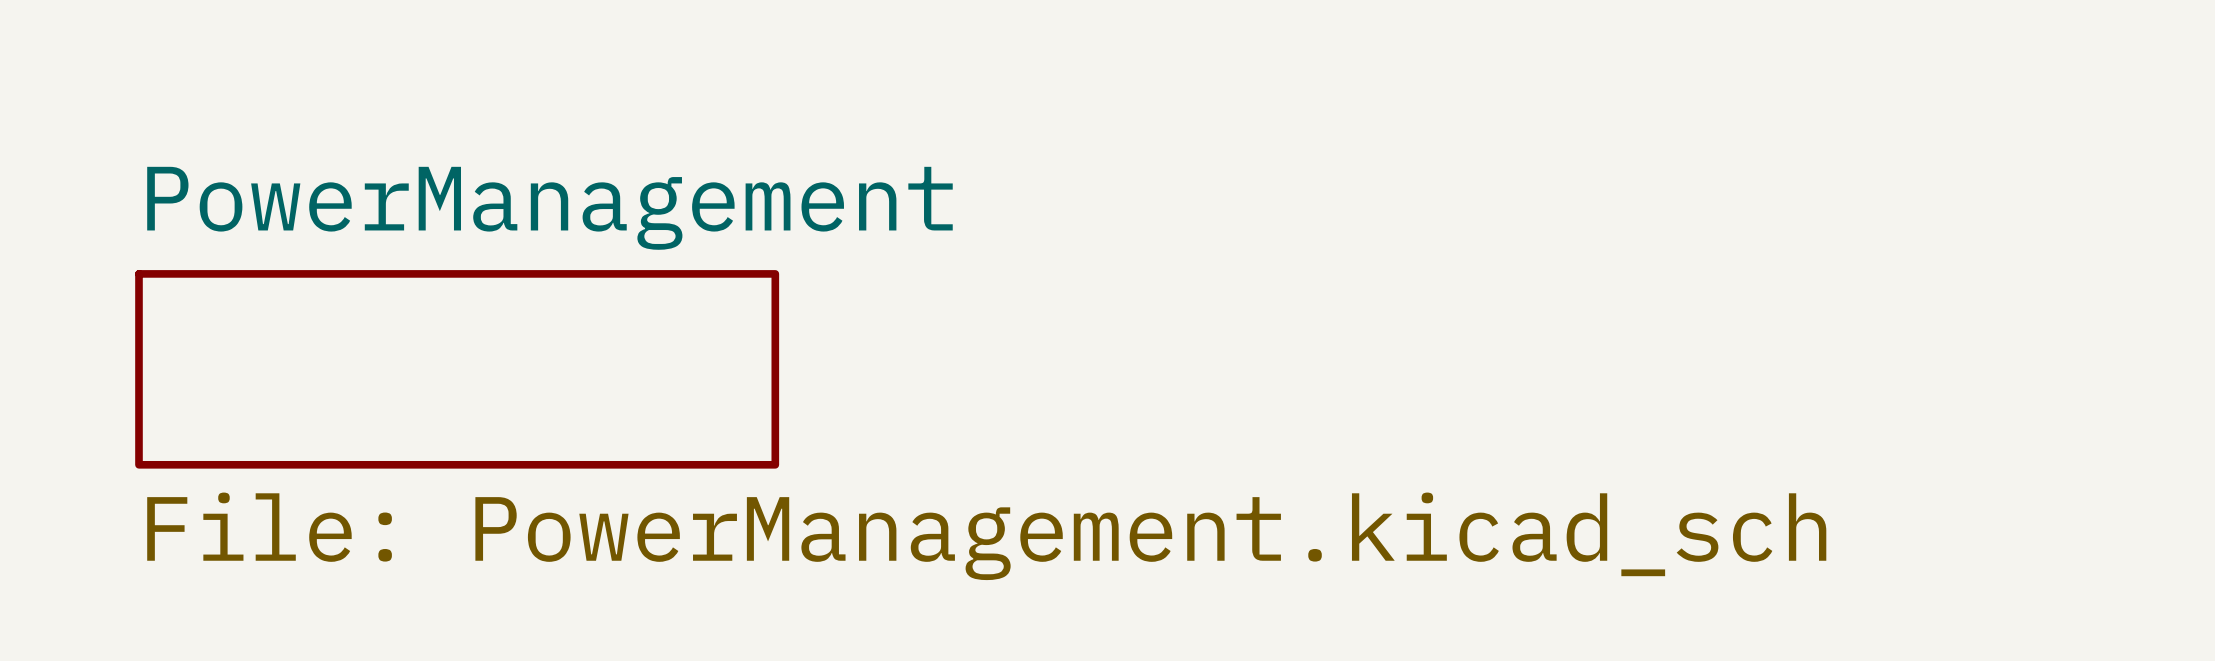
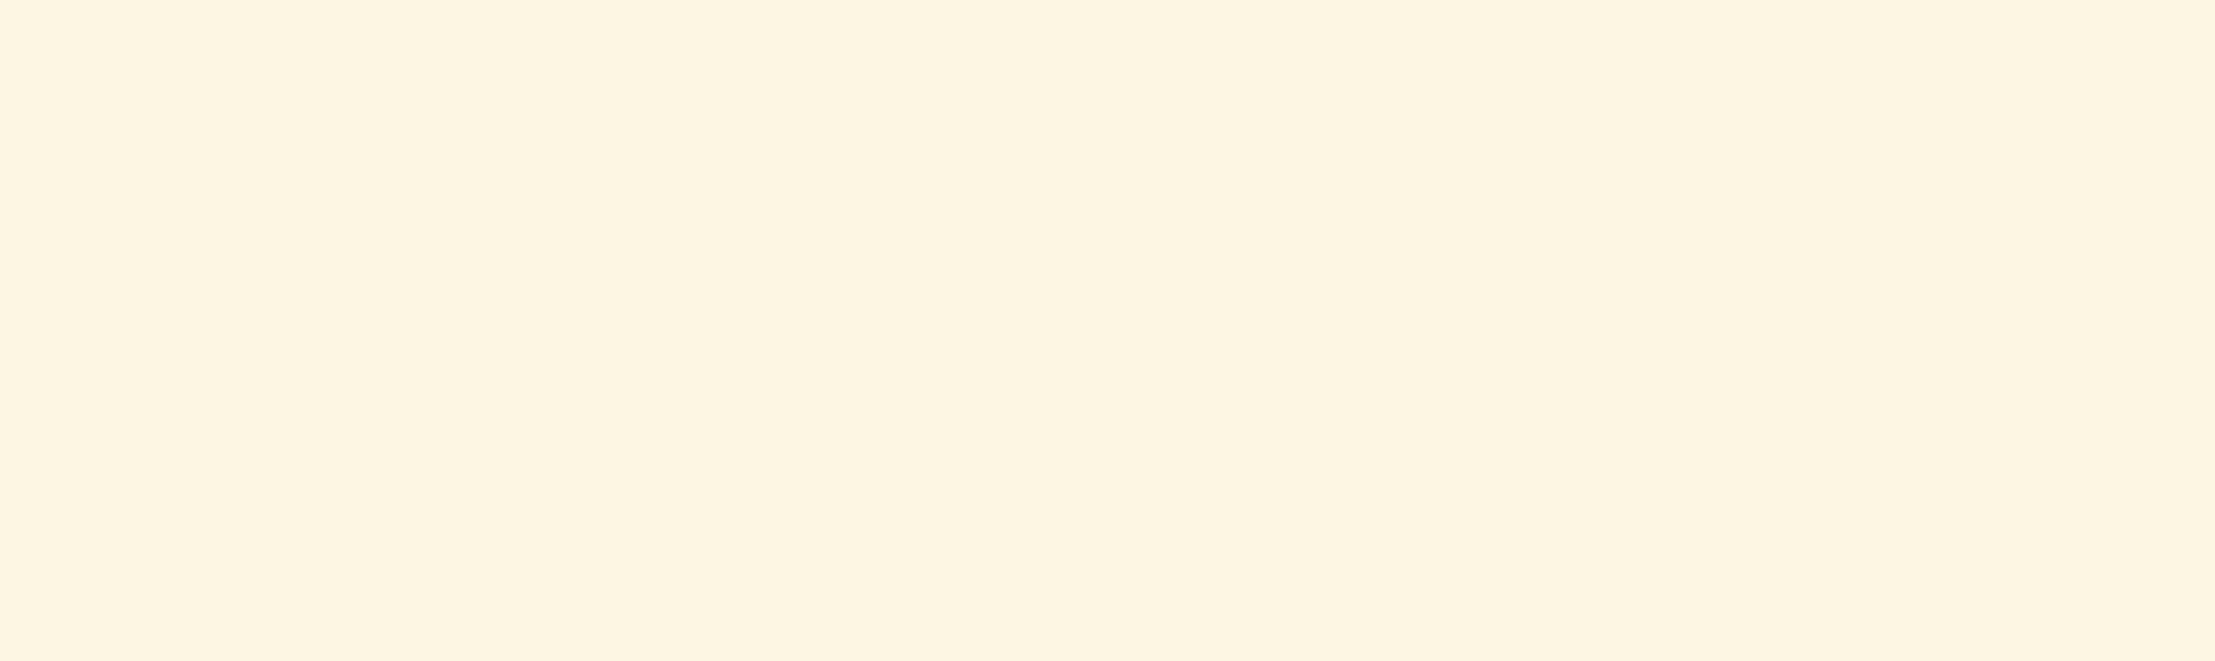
sheet PowerManagement: File: PowerManagement.kicad_sch (457, 369) -> none

